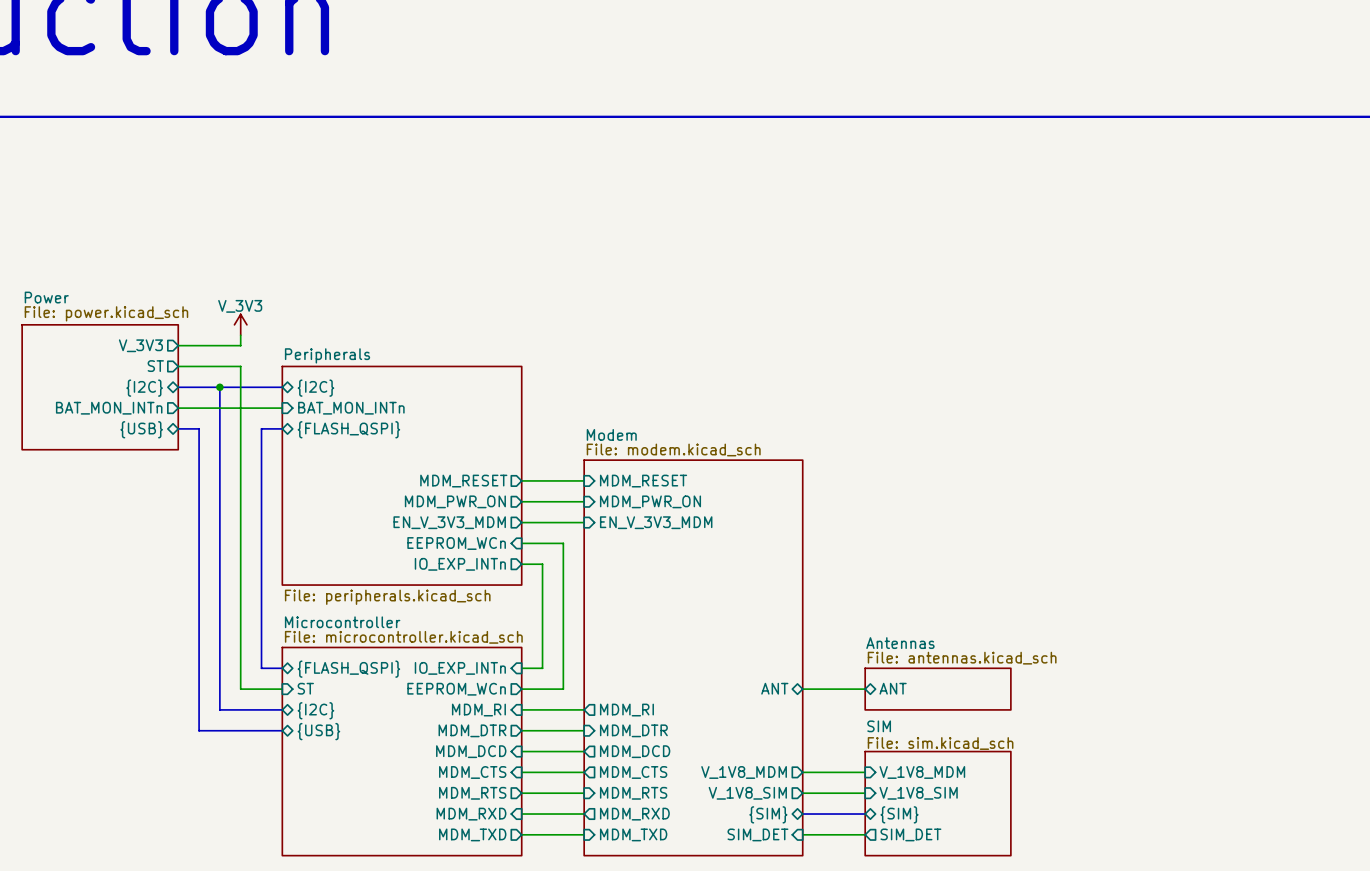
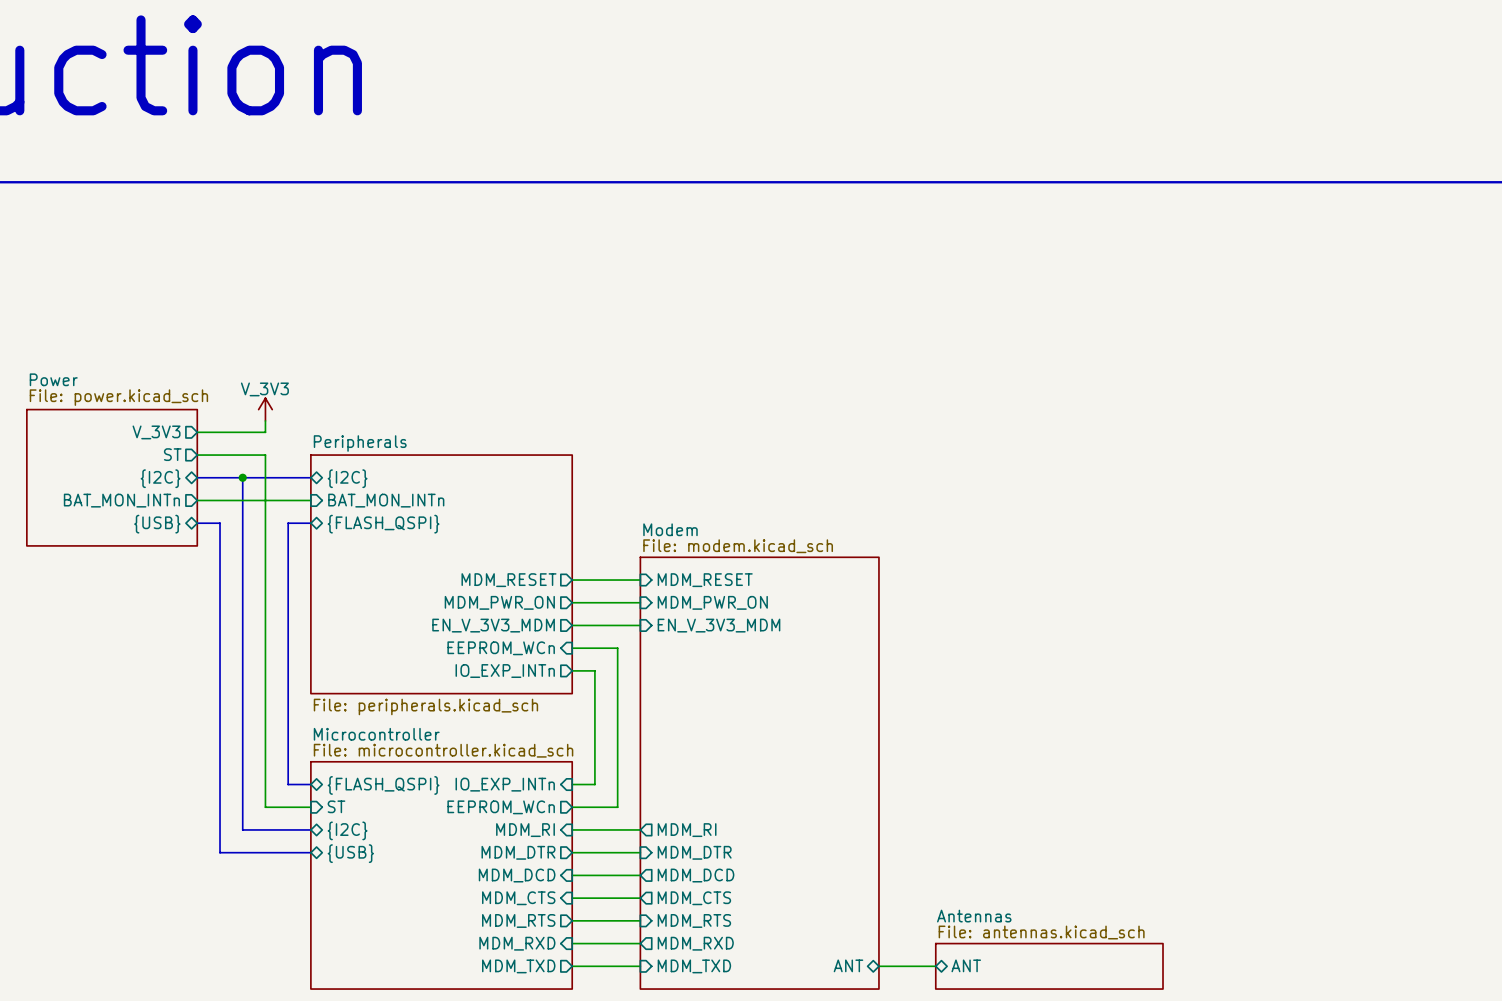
sheet pin: ANT (774, 688) -> none
sheet pin: ANT (893, 688) -> none
wire: (802, 689) (865, 689) -> none
sheet Antennas: File: antennas.kicad_sch (938, 689) -> none
sheet pin: V_1V8_MDM (744, 772) -> none
wire: (802, 772) (865, 772) -> none
sheet pin: V_1V8_MDM (922, 772) -> none
sheet pin: V_1V8_SIM (747, 793) -> none
wire: (802, 793) (865, 793) -> none
sheet pin: V_1V8_SIM (918, 793) -> none
sheet SIM: File: sim.kicad_sch (938, 803) -> none
sheet pin: {SIM} (768, 814) -> none
bus: (802, 814) (865, 814) -> none
sheet pin: {SIM} (899, 814) -> none
sheet pin shape: input (757, 834) -> bidirectional (848, 965)
sheet pin: SIM_DET (757, 834) -> ANT (848, 965)
wire: (854, 834) (865, 834) -> none
sheet pin: none -> ANT (966, 965)
sheet pin: SIM_DET (910, 834) -> none
sheet Antennas: none -> File: antennas.kicad_sch (1049, 966)

